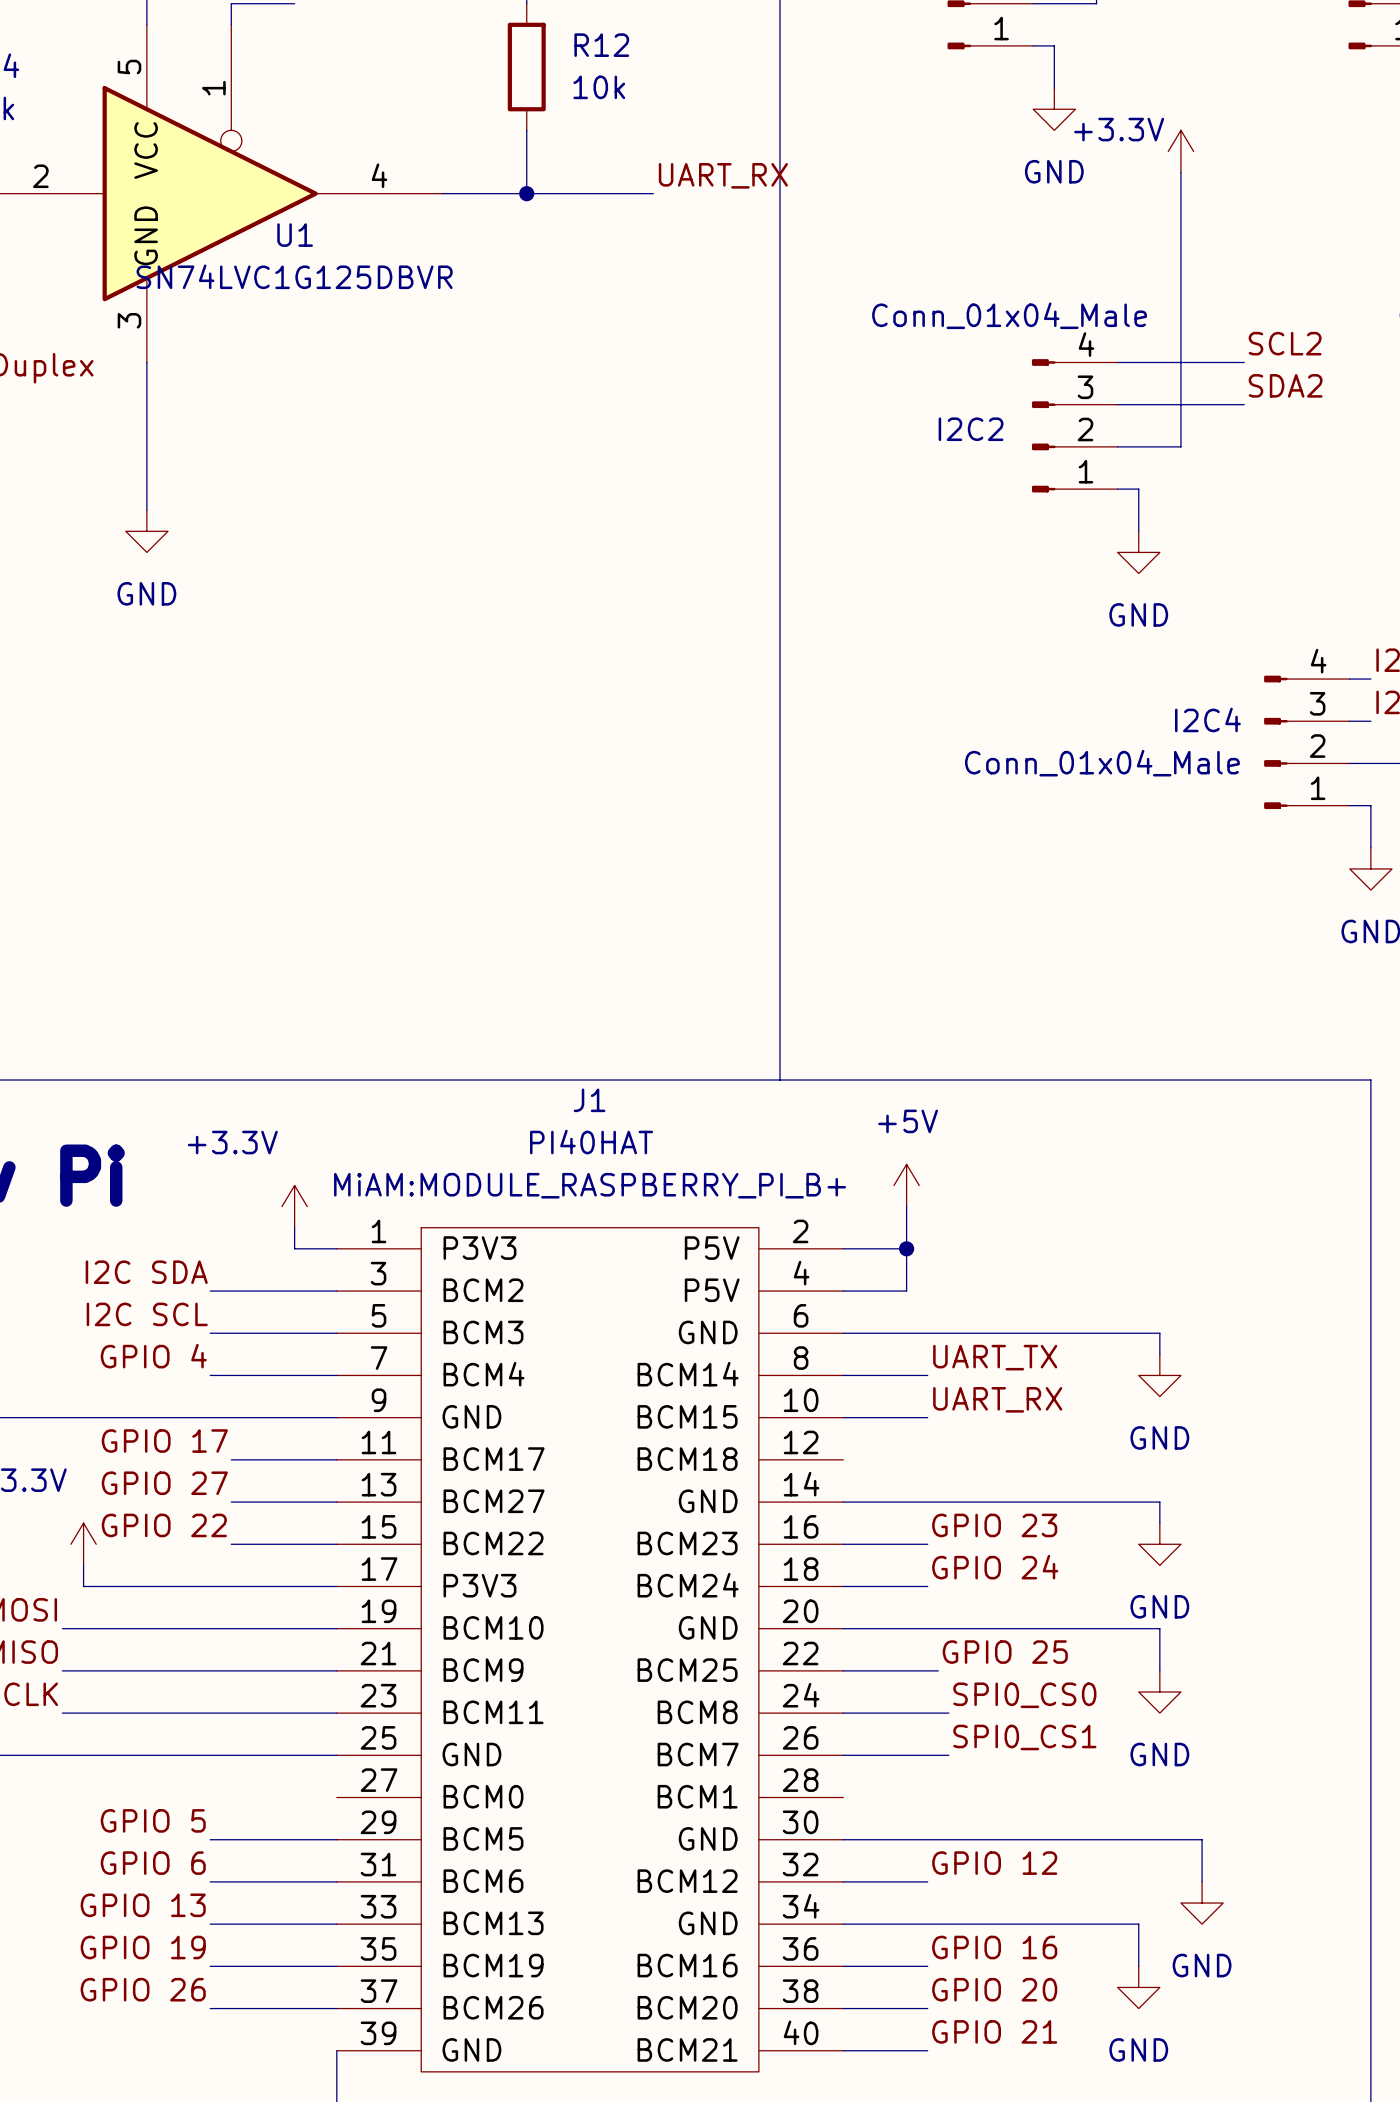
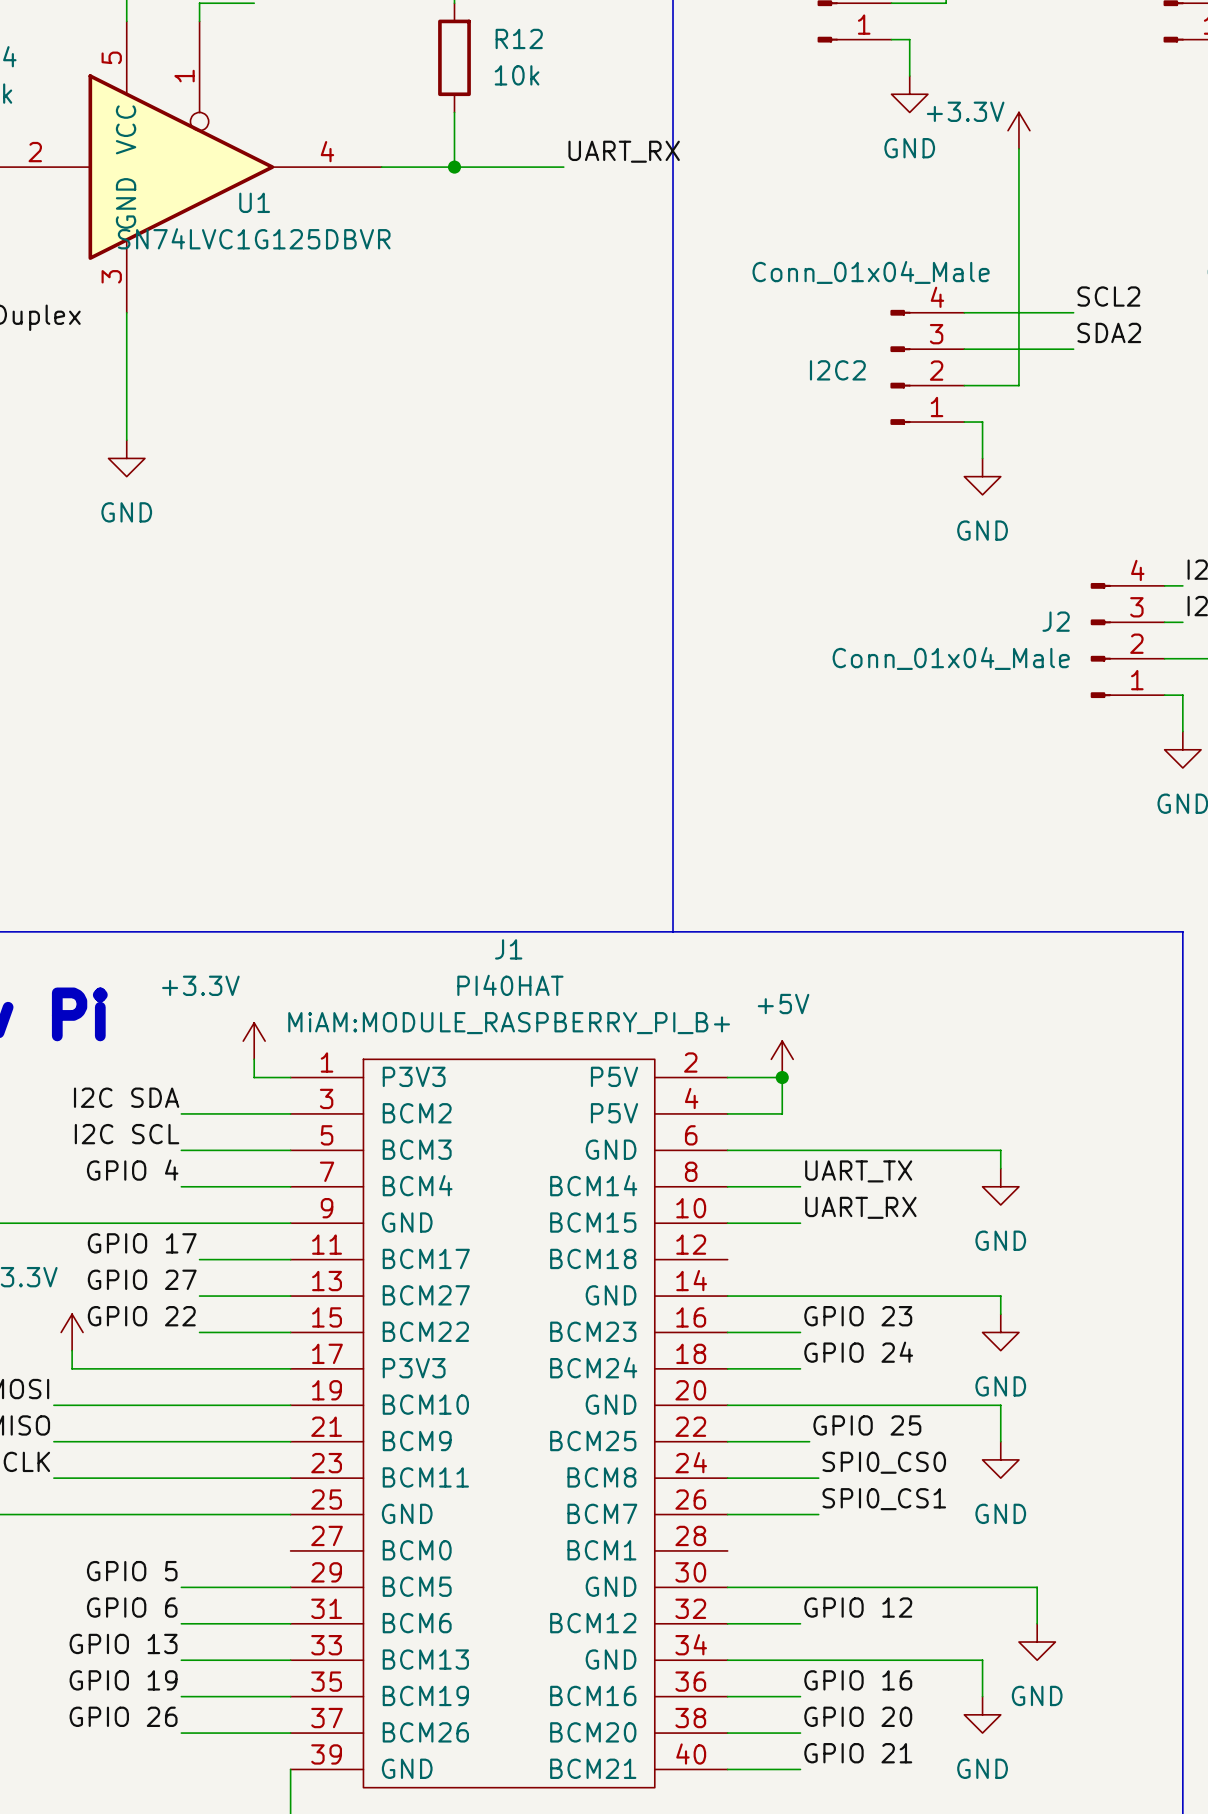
I2C4 name: I2C4 (1207, 719) -> J2 (1056, 621)
power symbol position: +5V (906, 1185) -> +5V (782, 1059)

